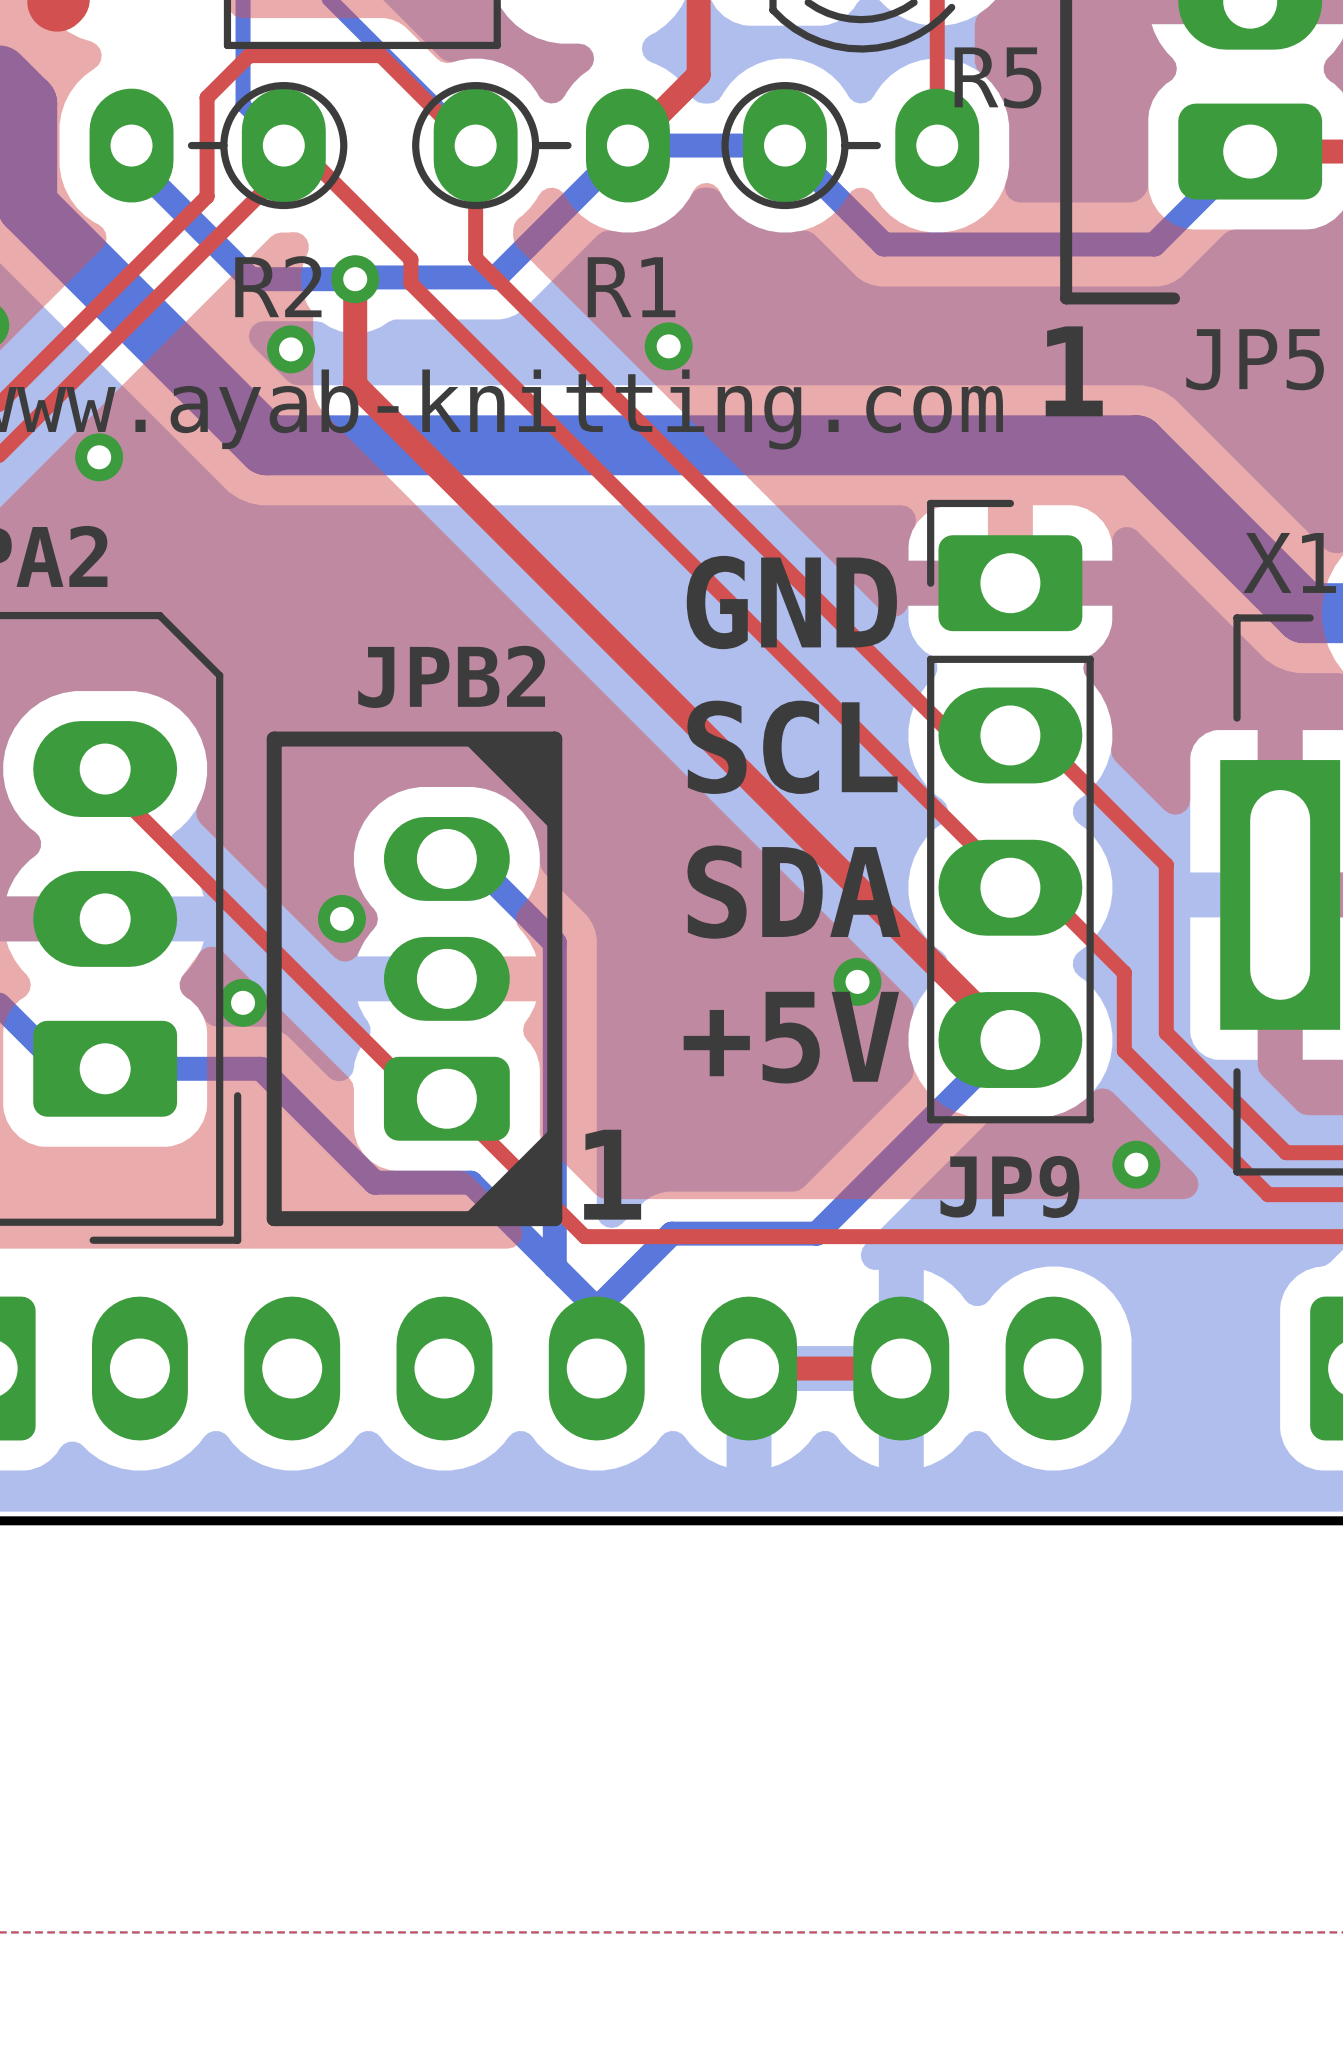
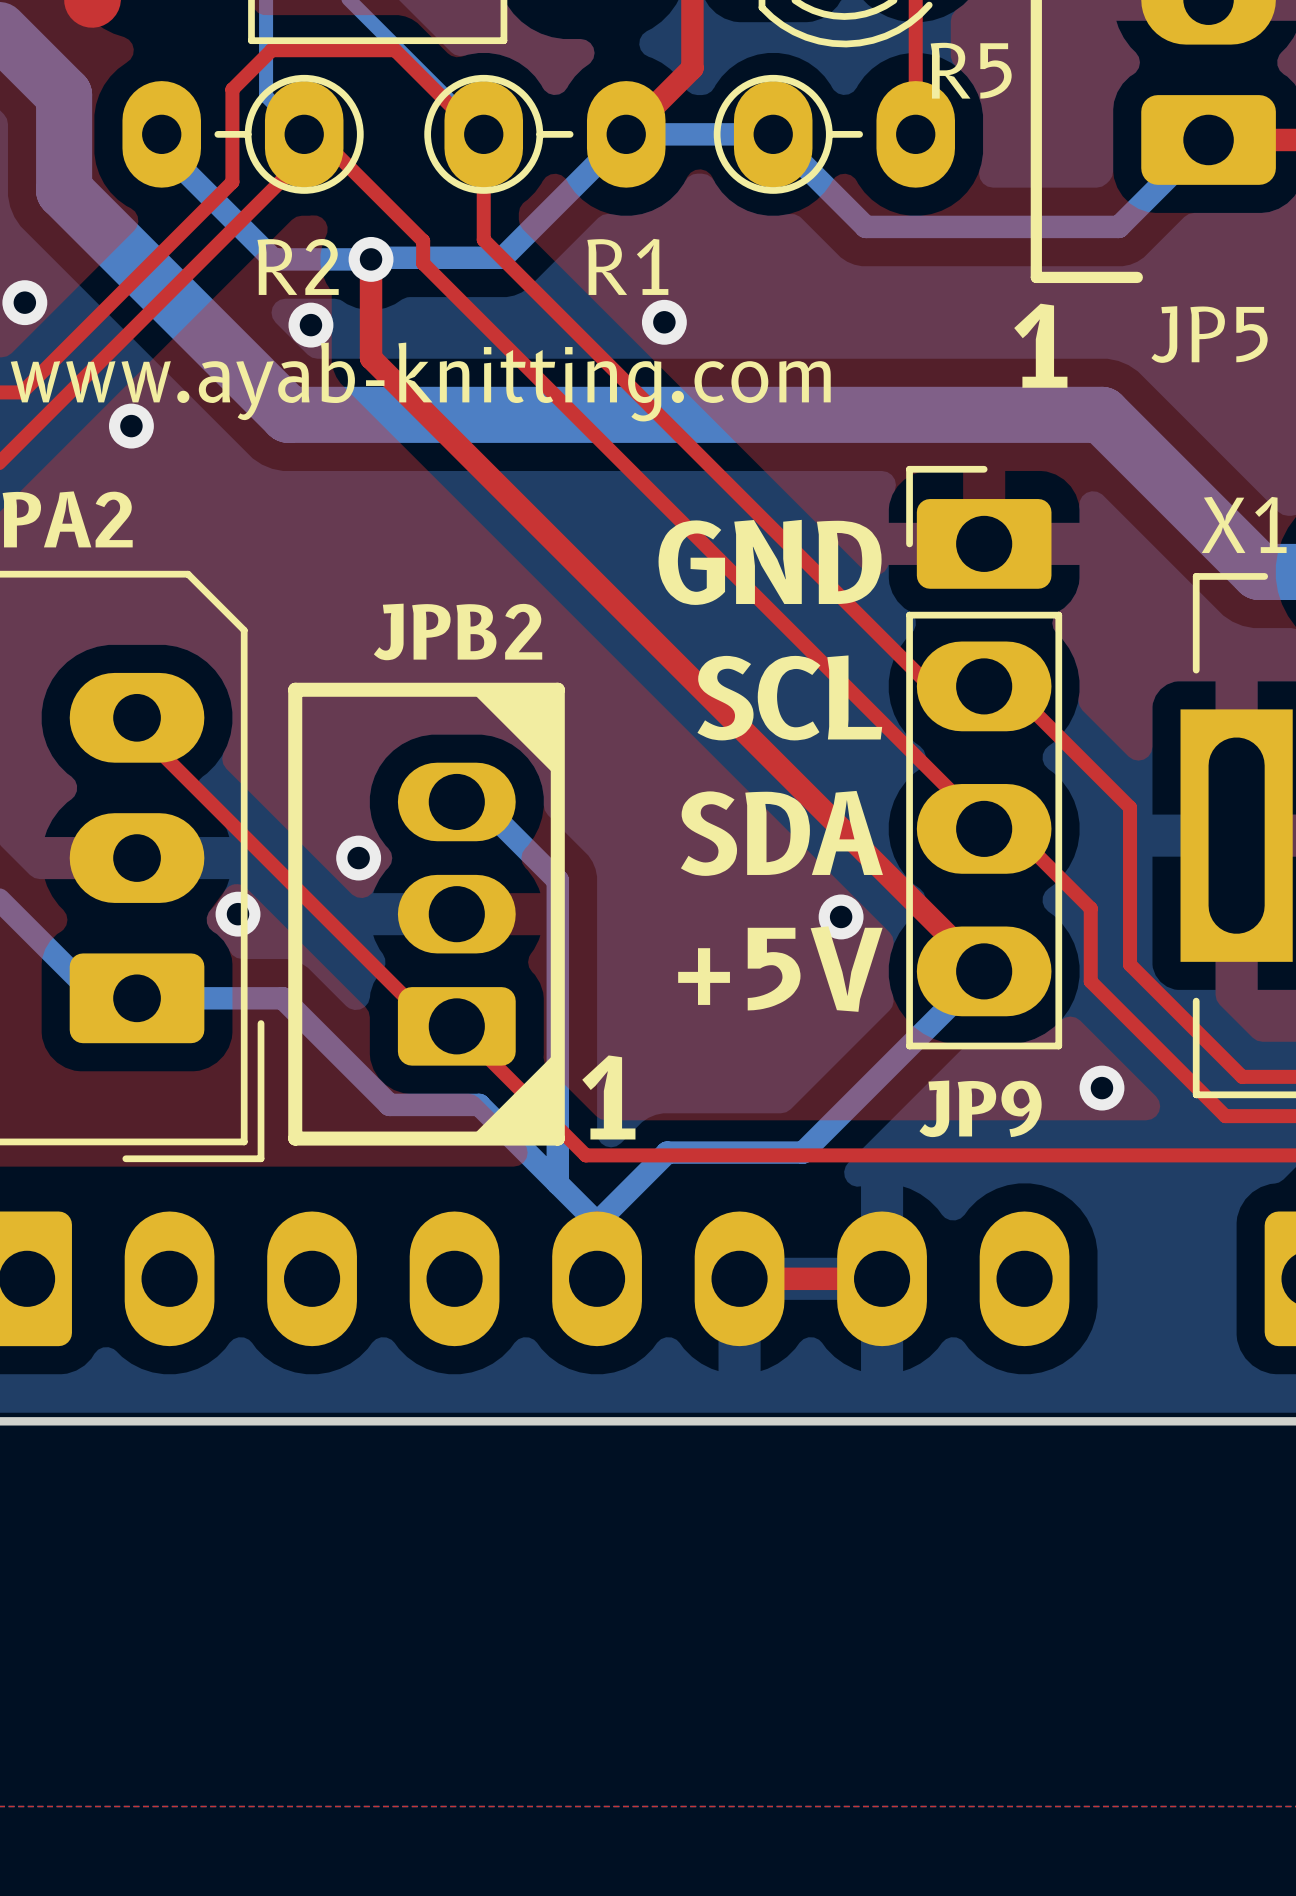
via position: (243, 1002) -> (238, 914)

